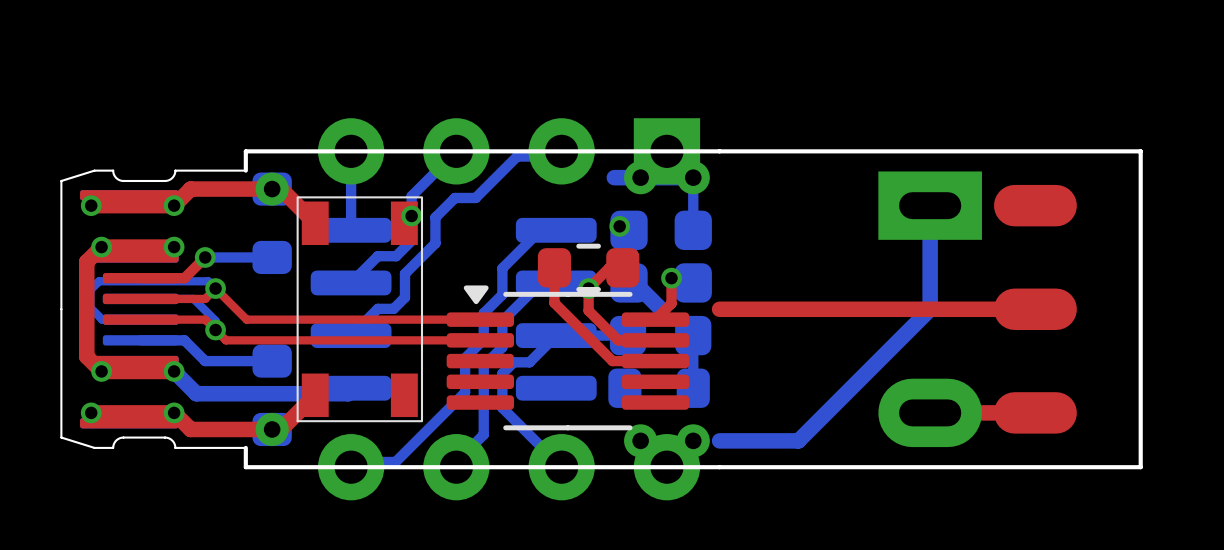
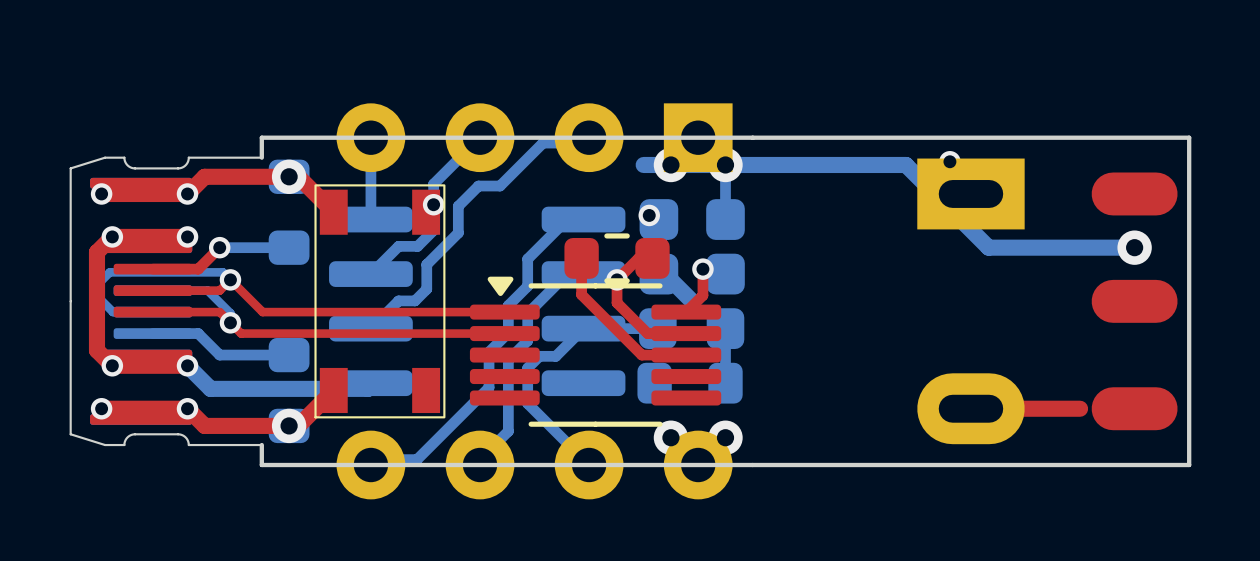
via: none -> (949, 161)
bottom track: none -> (725, 164) (905, 164) (988, 247) (1134, 247)
bottom track: (930, 205) (930, 309) (798, 440) (719, 440) -> none
via: none -> (1134, 247)
top track: (719, 309) (1035, 309) -> none
part position: (1035, 309) -> (1134, 301)

